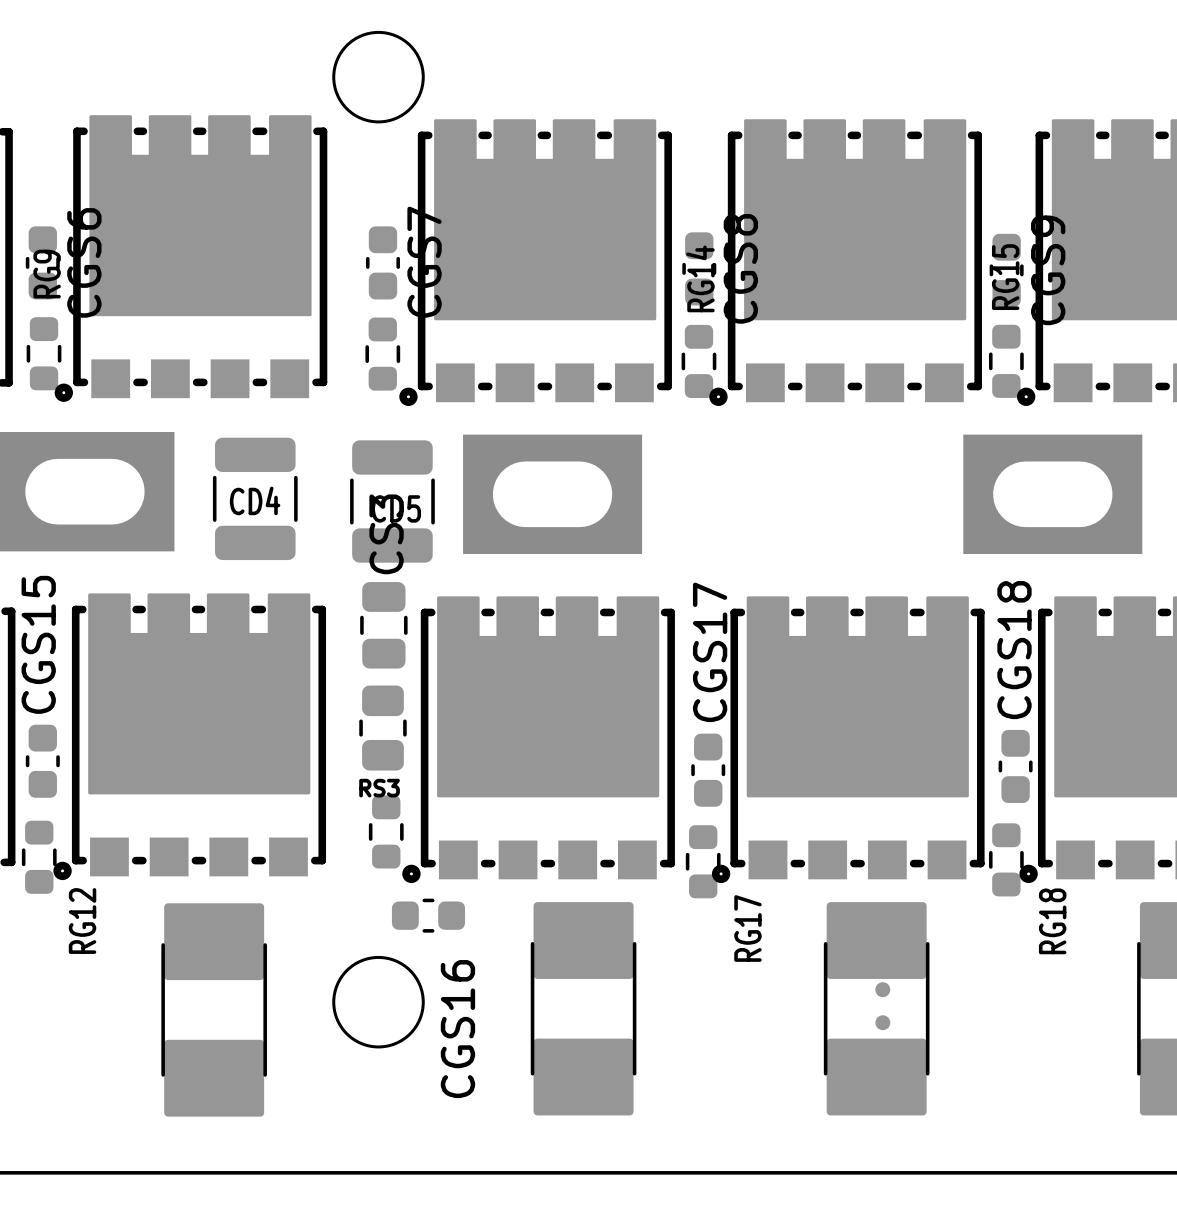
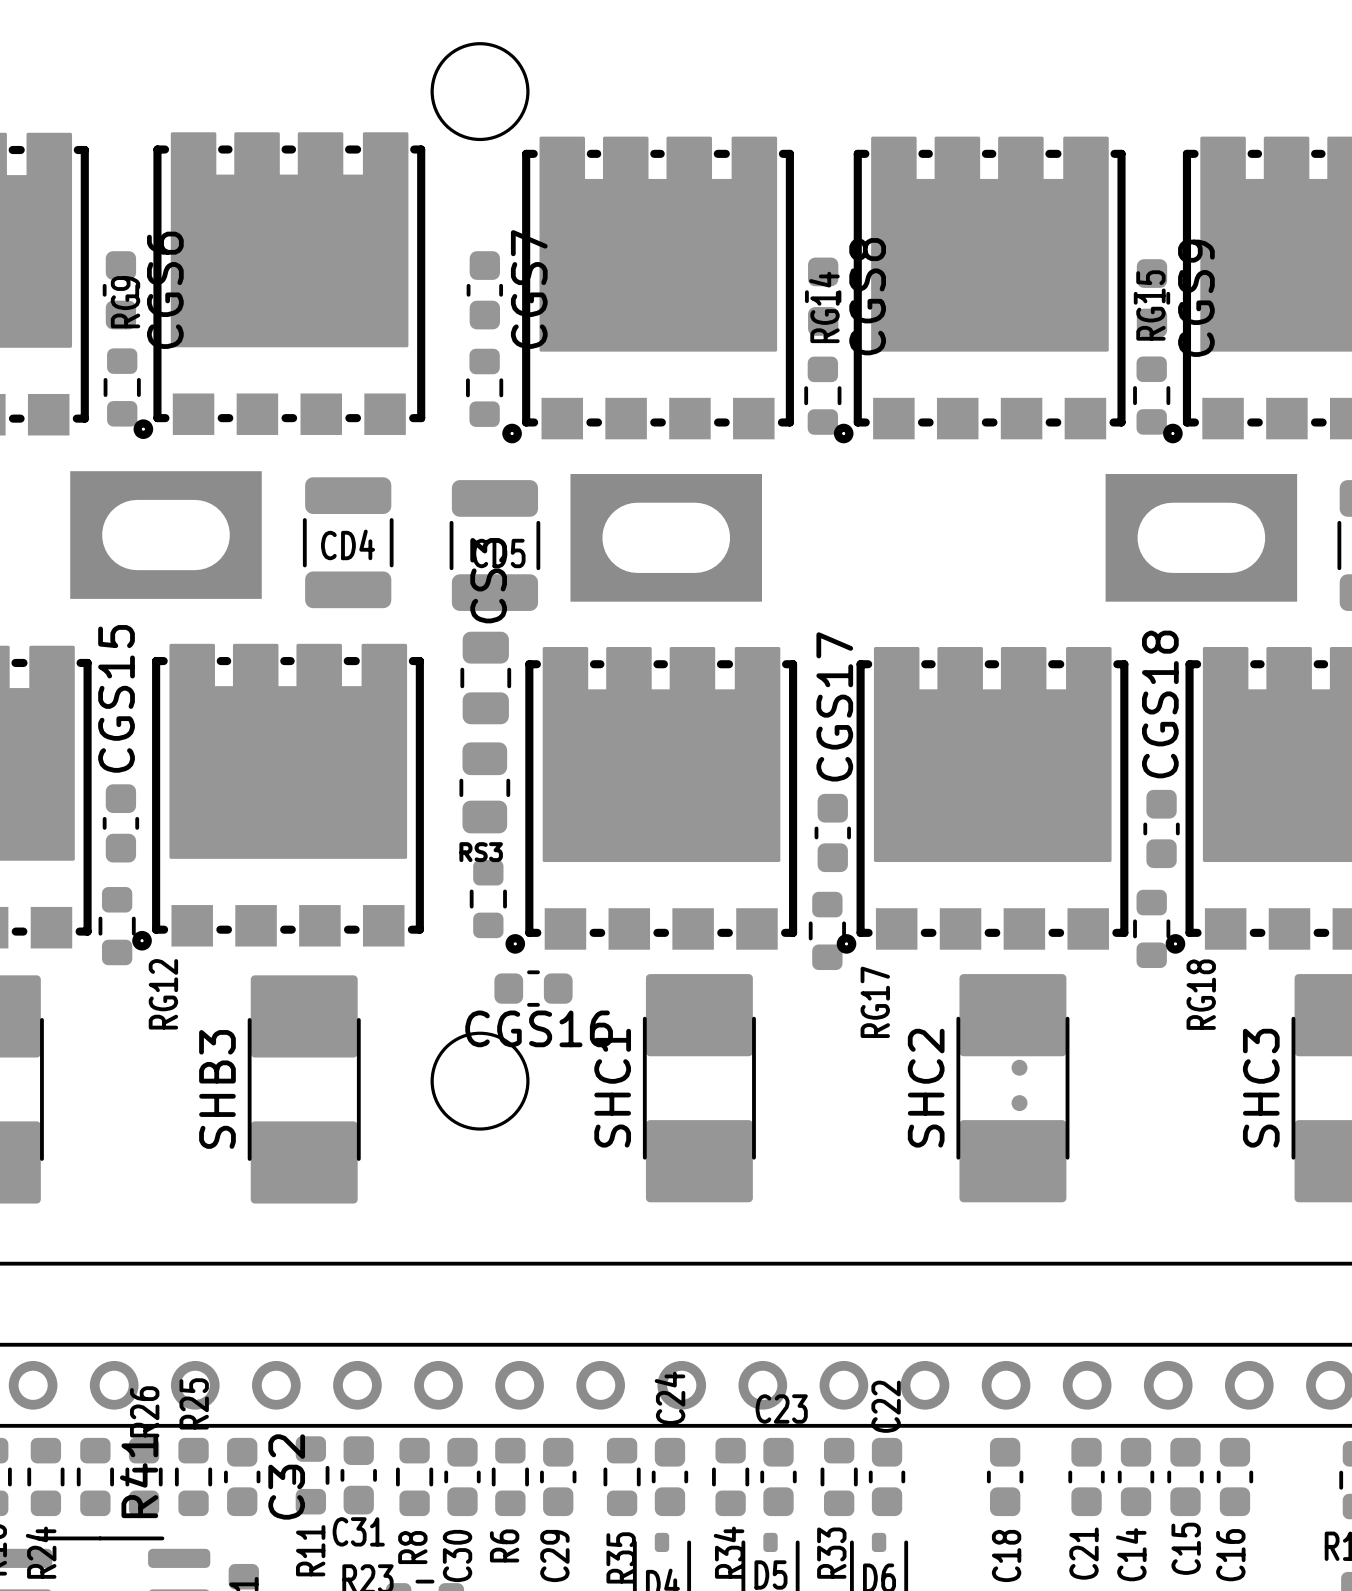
SHC1 name: none -> SHC1 (612, 1088)
SHC2 name: none -> SHC2 (926, 1088)
SHC3 name: none -> SHC3 (1261, 1088)
SHB3 name: none -> SHB3 (217, 1089)
CGS16 name rotation: 0° (457, 1029) -> 90° clockwise (539, 1028)

